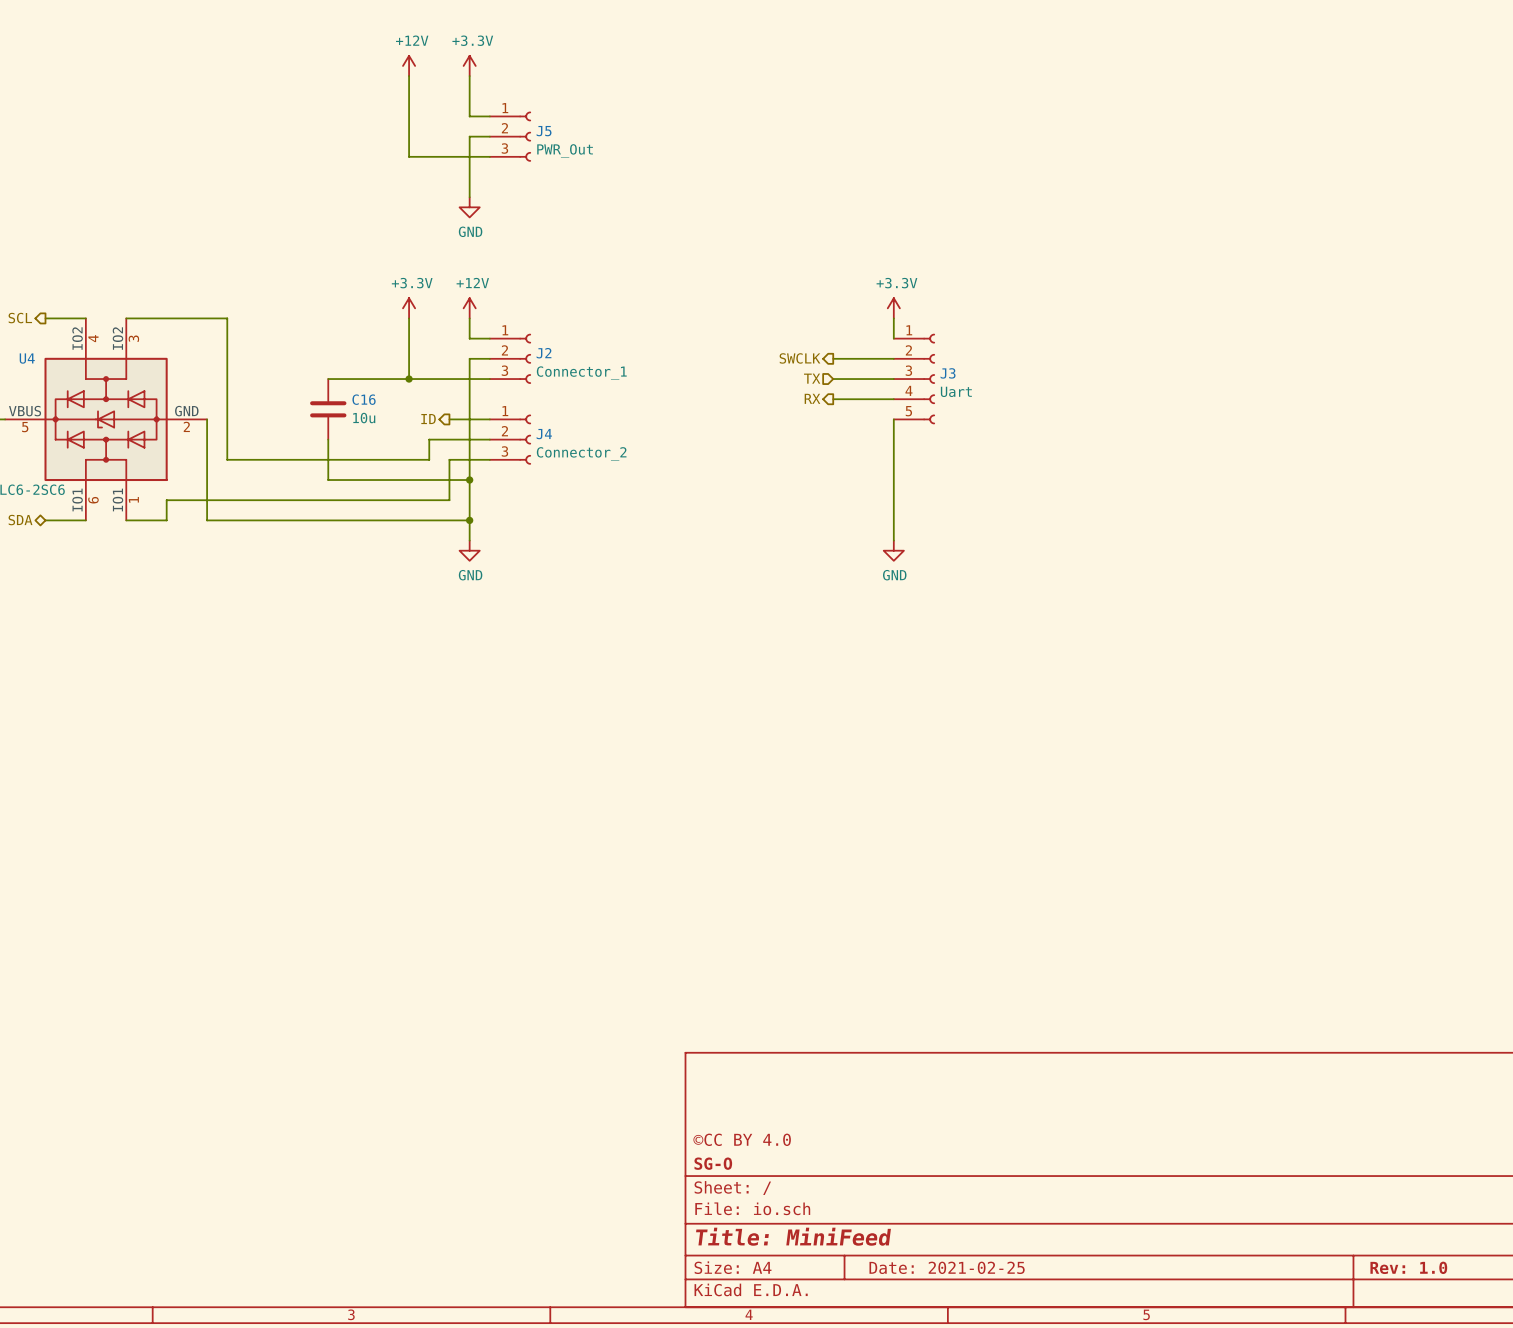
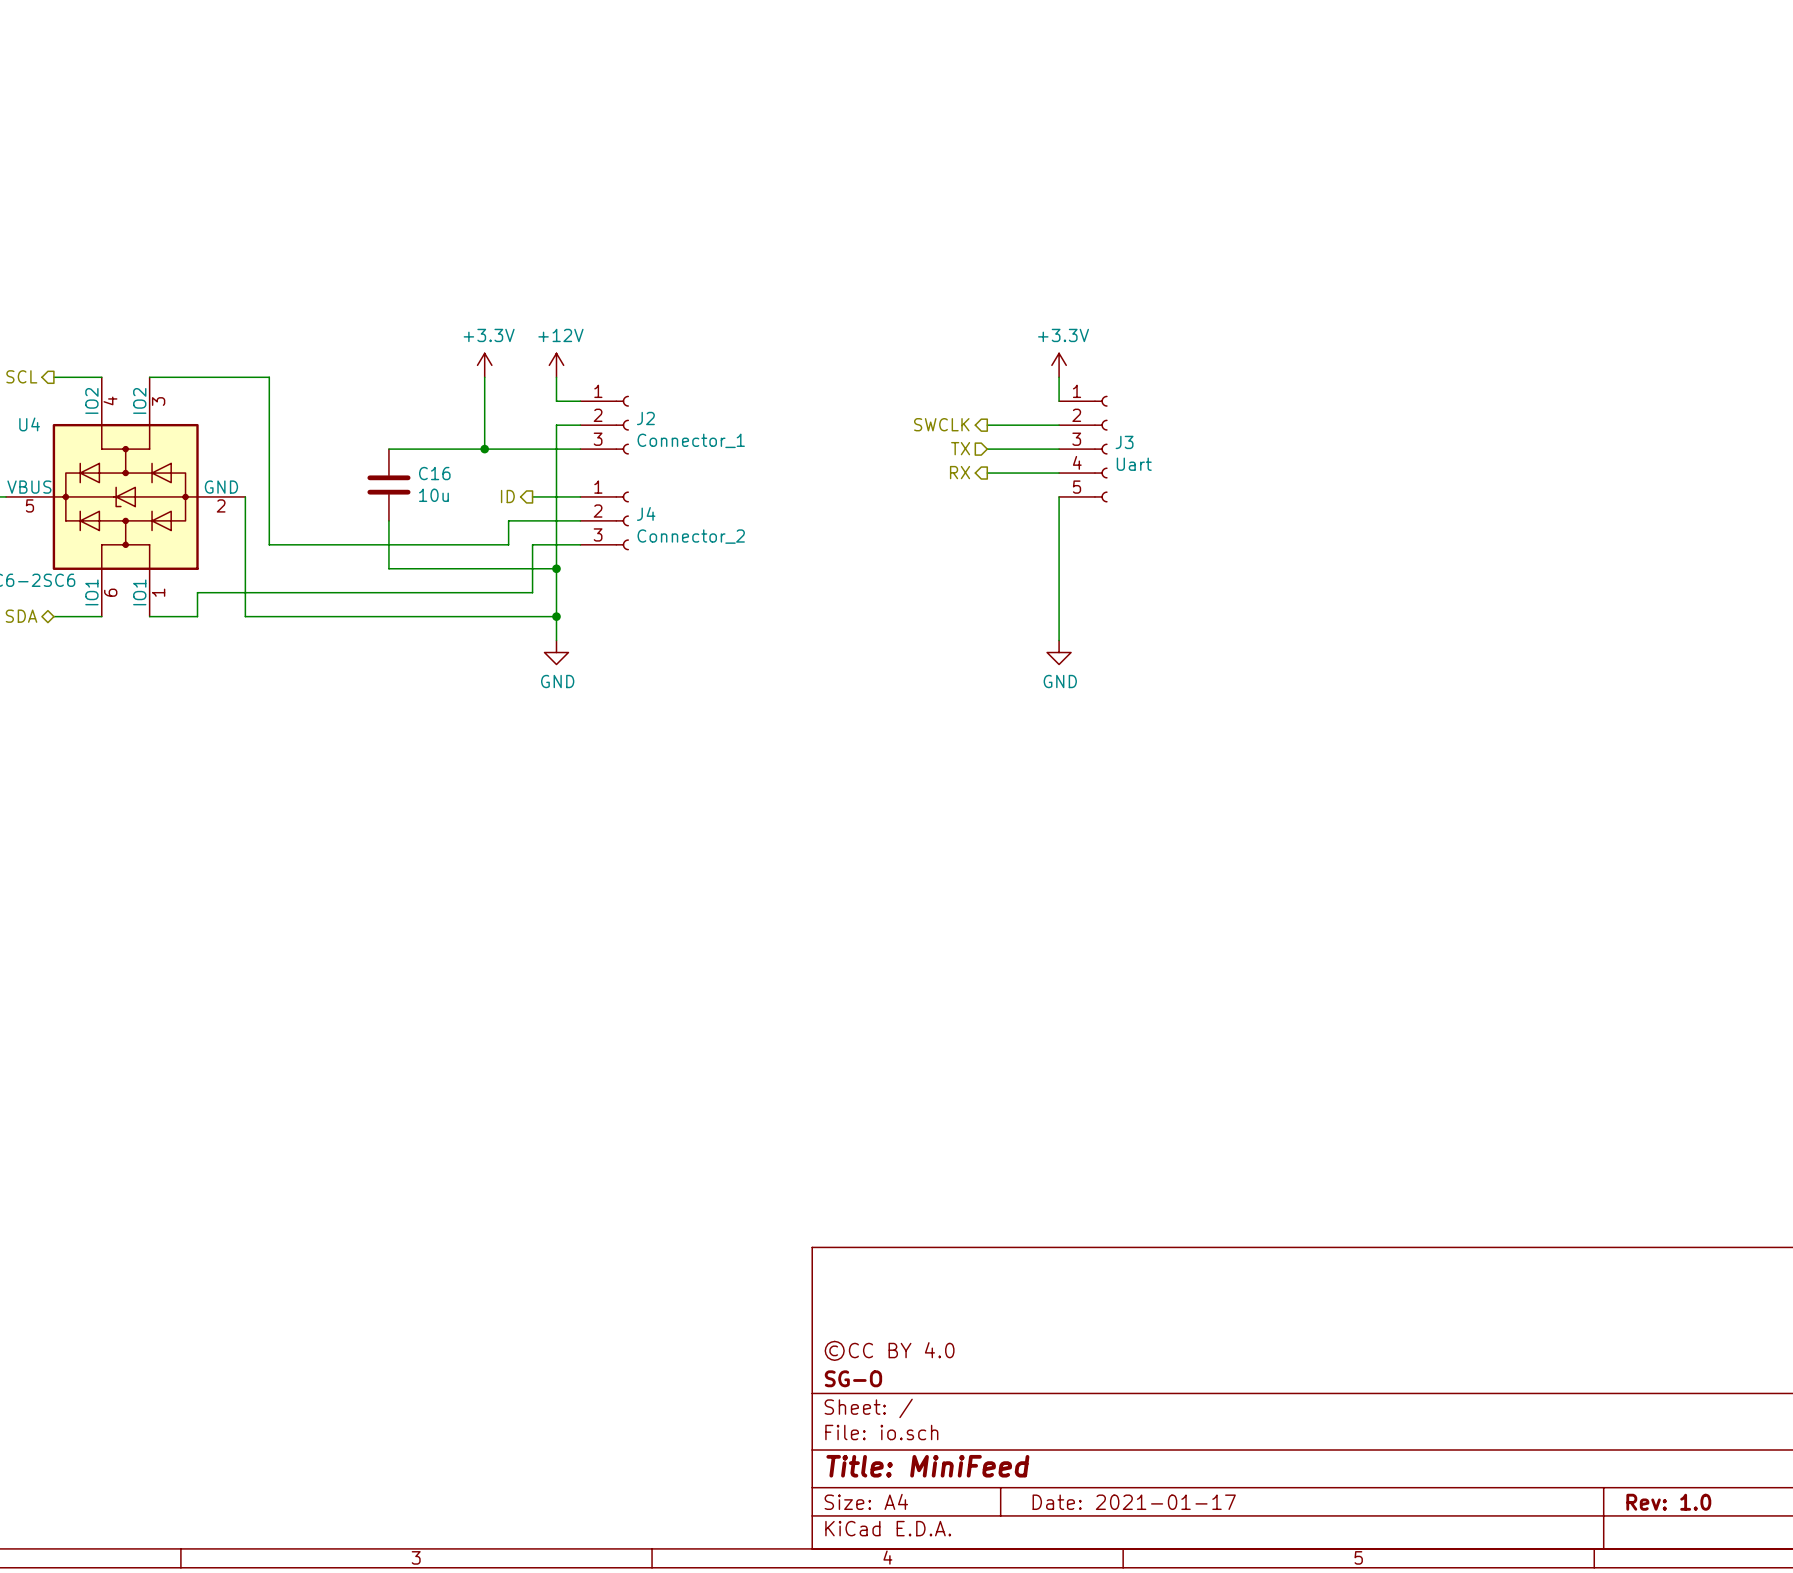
power symbol: +12V (409, 65) -> none
power symbol: +3.3V (469, 65) -> none
wire: (409, 76) (409, 156) (489, 156) -> none
wire: (469, 76) (469, 116) (489, 116) -> none
wire: (489, 136) (469, 136) (469, 197) -> none
J5: PWR_Out (510, 136) -> none
power symbol: GND (469, 207) -> none
title block: Date: 2021-02-25 (947, 1267) -> Date: 2021-01-17 (1134, 1502)

